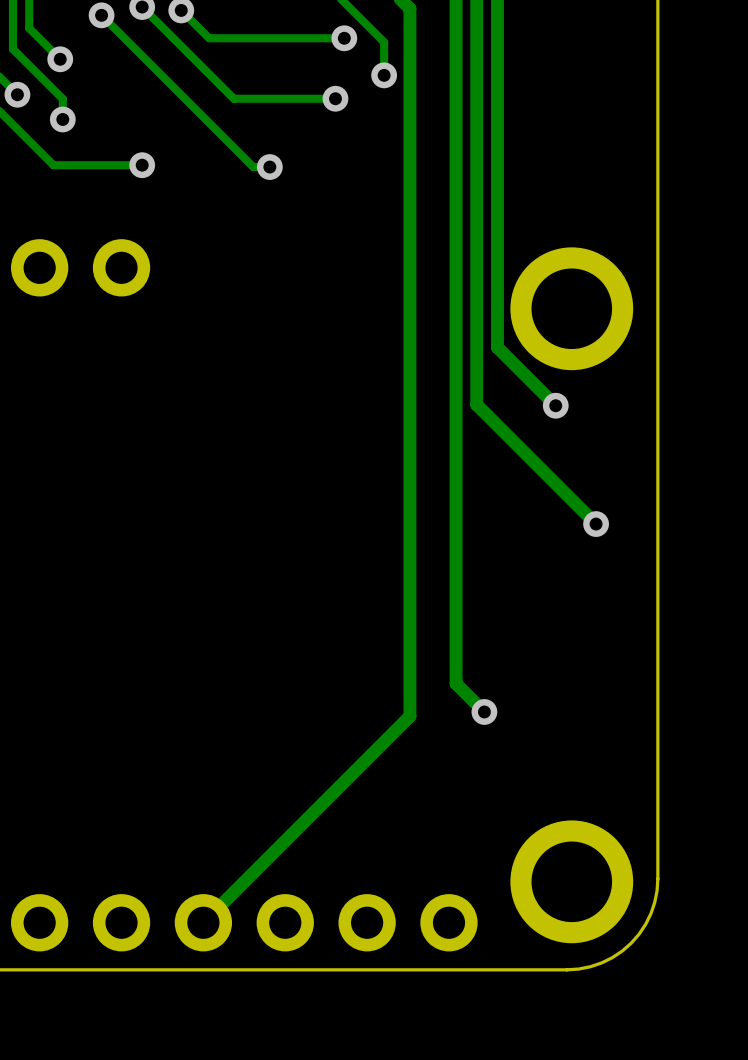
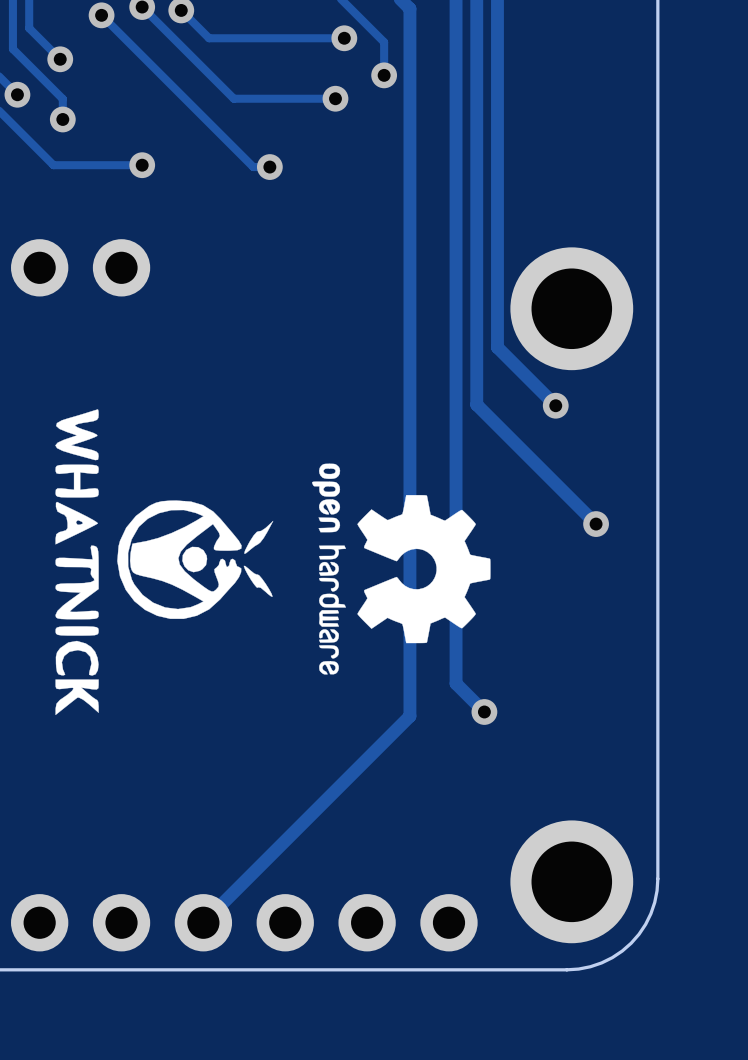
drawing: none -> [55, 409, 274, 716]
drawing: none -> [312, 463, 491, 675]

